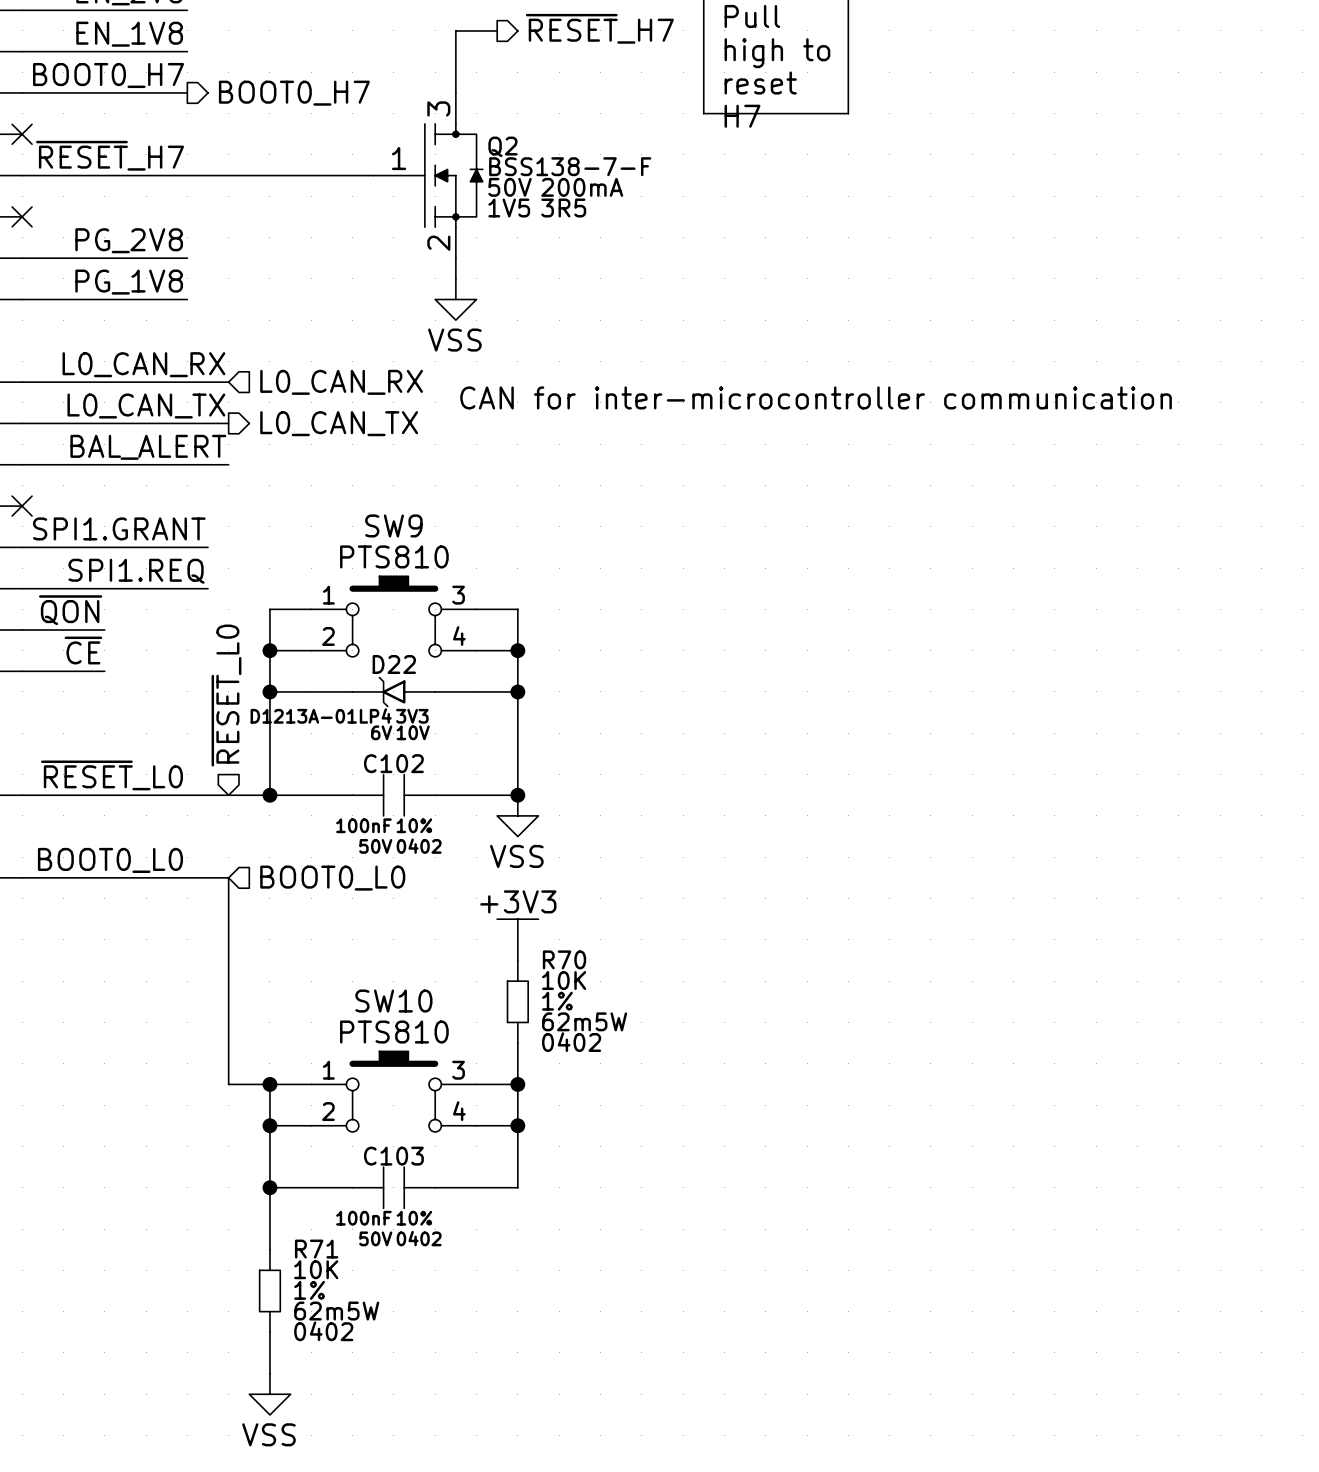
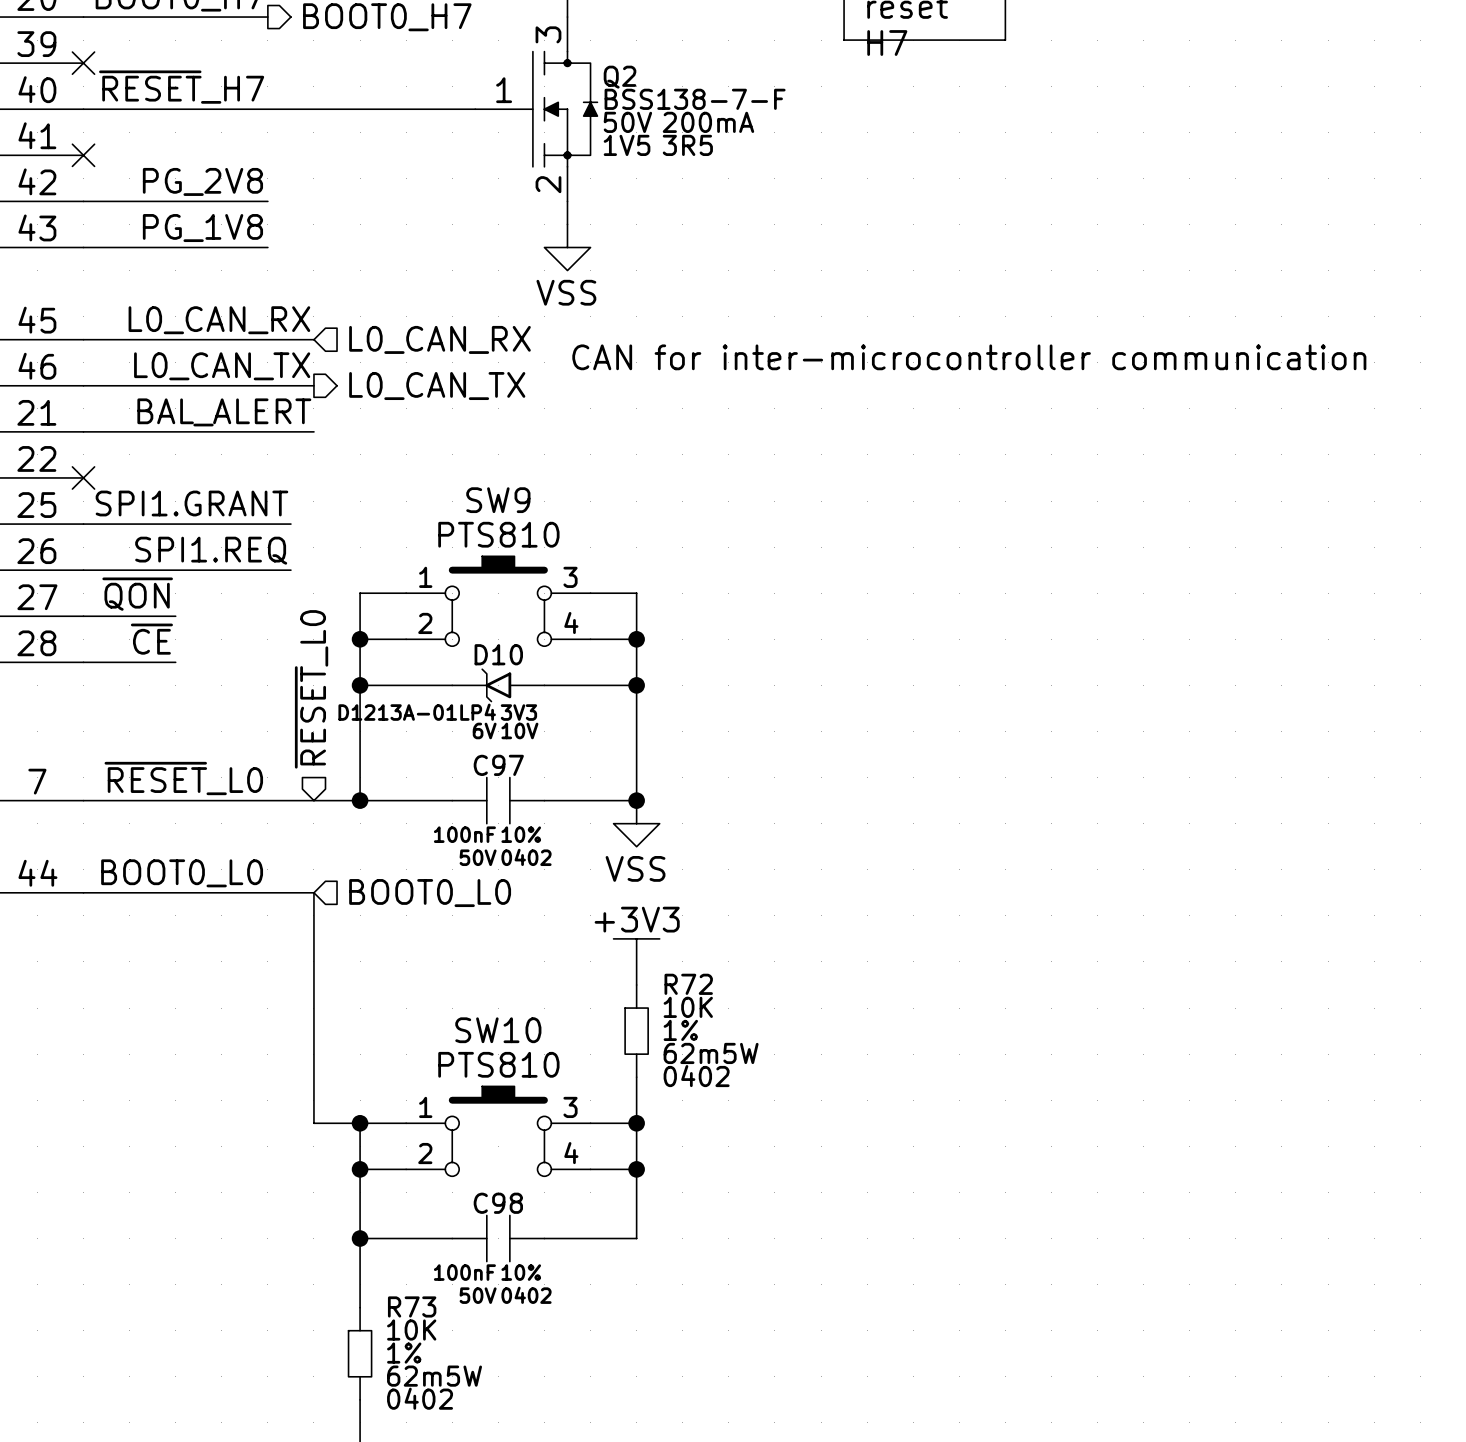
D22 name: D22 (394, 664) -> D10 (498, 654)
C102 name: C102 (393, 763) -> C97 (498, 765)
R70 name: R70 (564, 959) -> R72 (688, 984)
C103 name: C103 (393, 1156) -> C98 (498, 1203)
R71 name: R71 (316, 1249) -> R73 (412, 1306)

